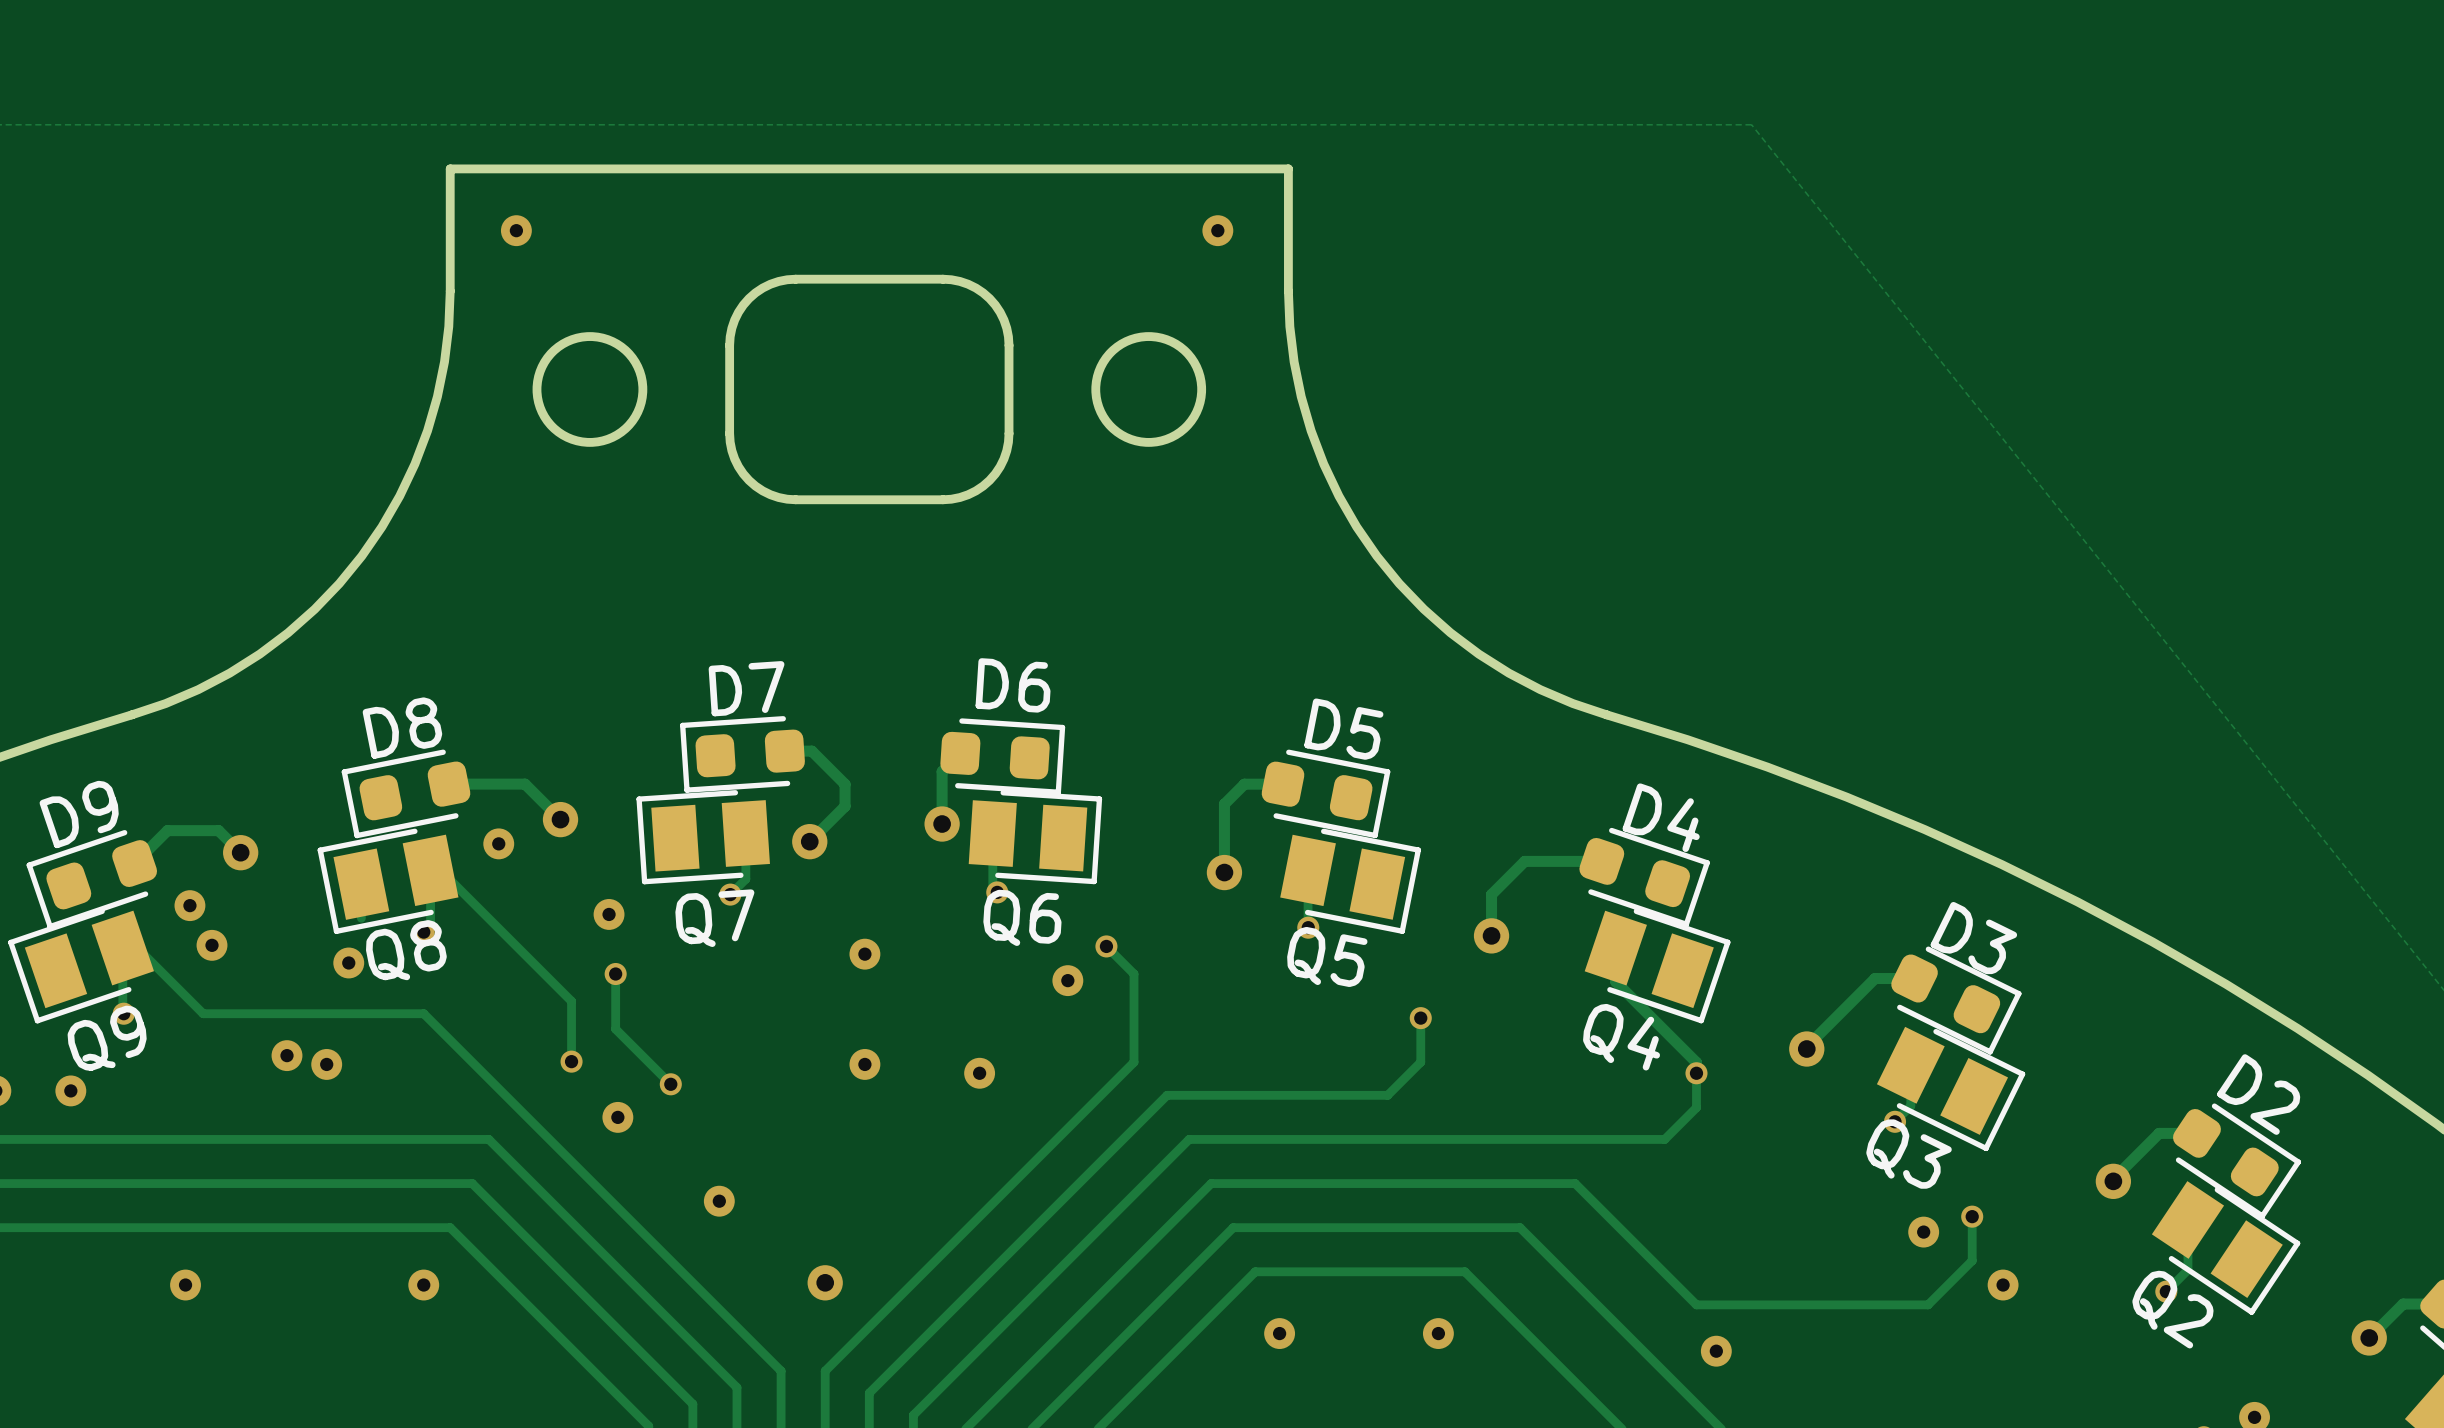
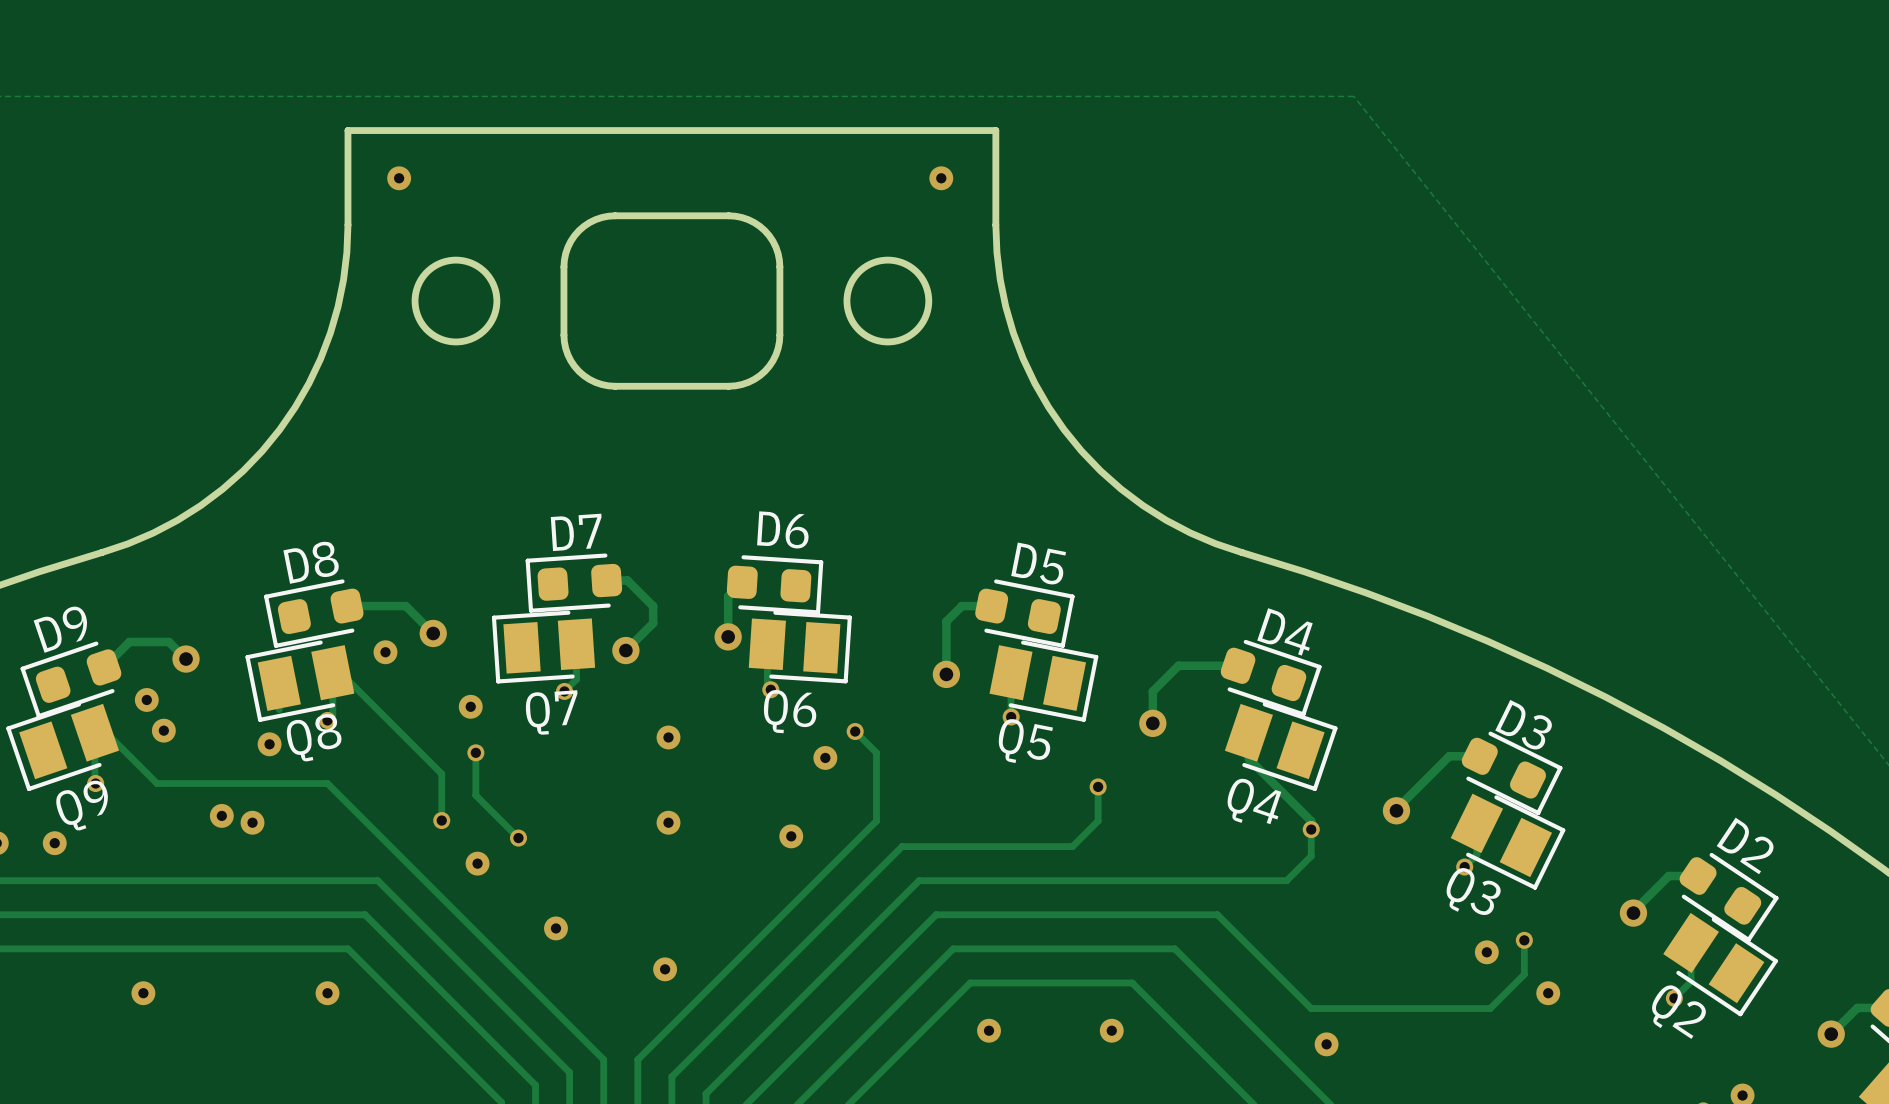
via position: (979, 1073) -> (791, 836)
via: none -> (665, 969)
via: (825, 1282) -> none

